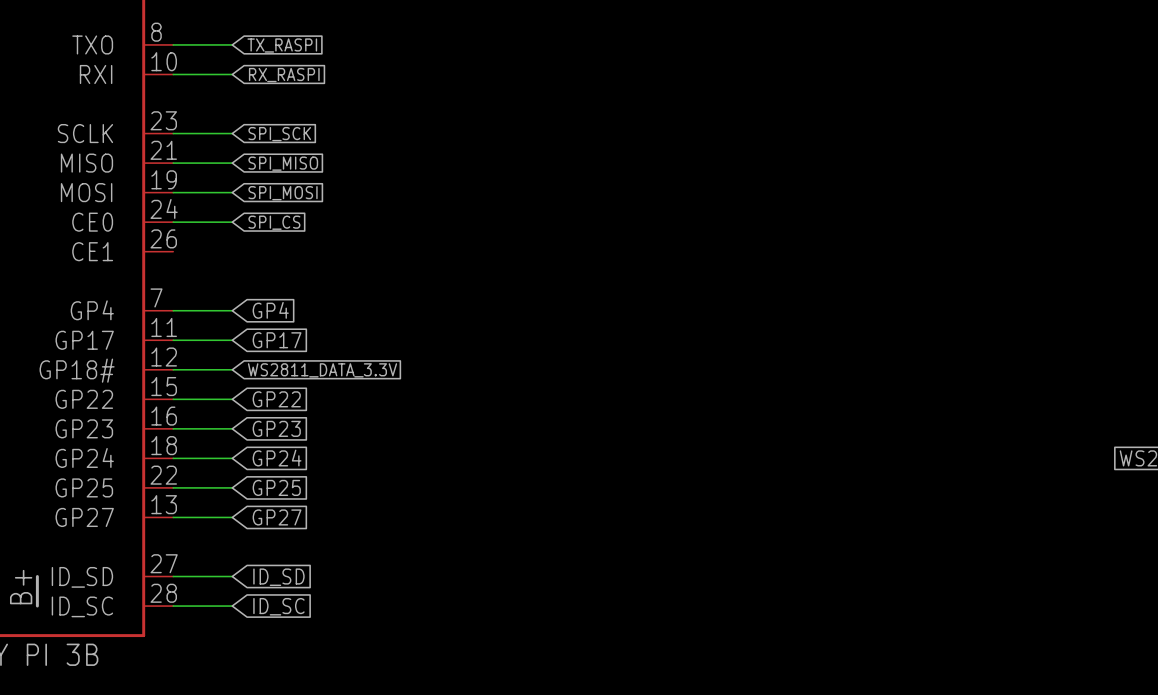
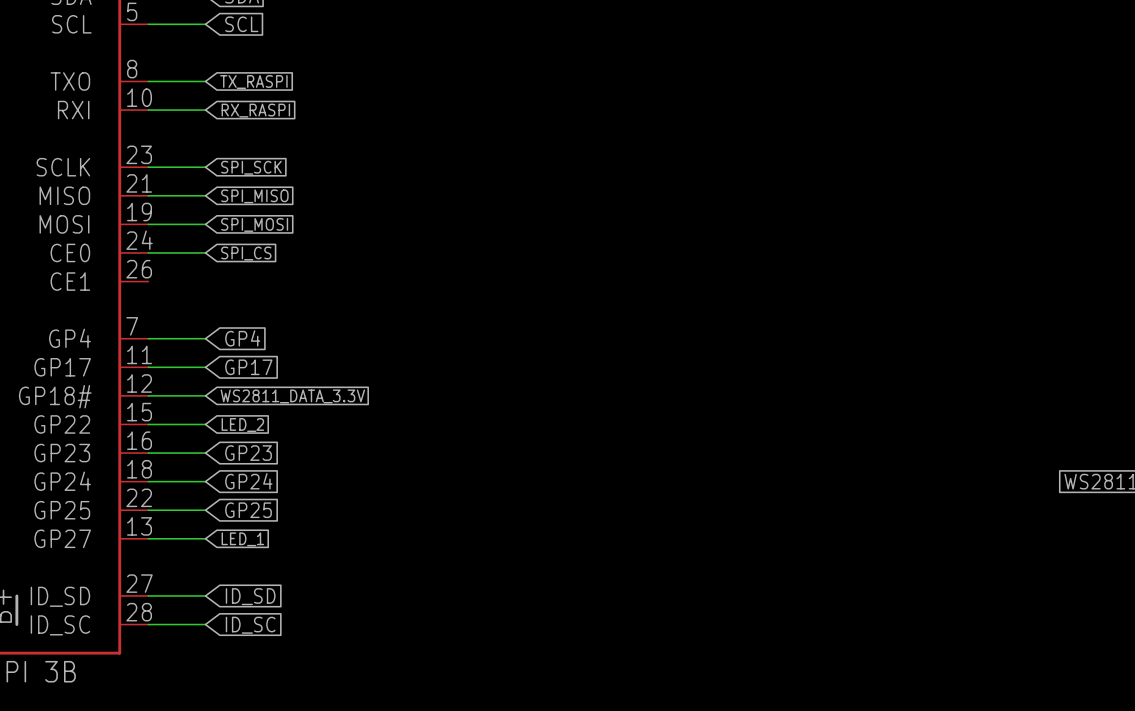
global label: GP22 (276, 399) -> LED_2 (242, 425)
global label: GP27 (277, 517) -> LED_1 (242, 539)

